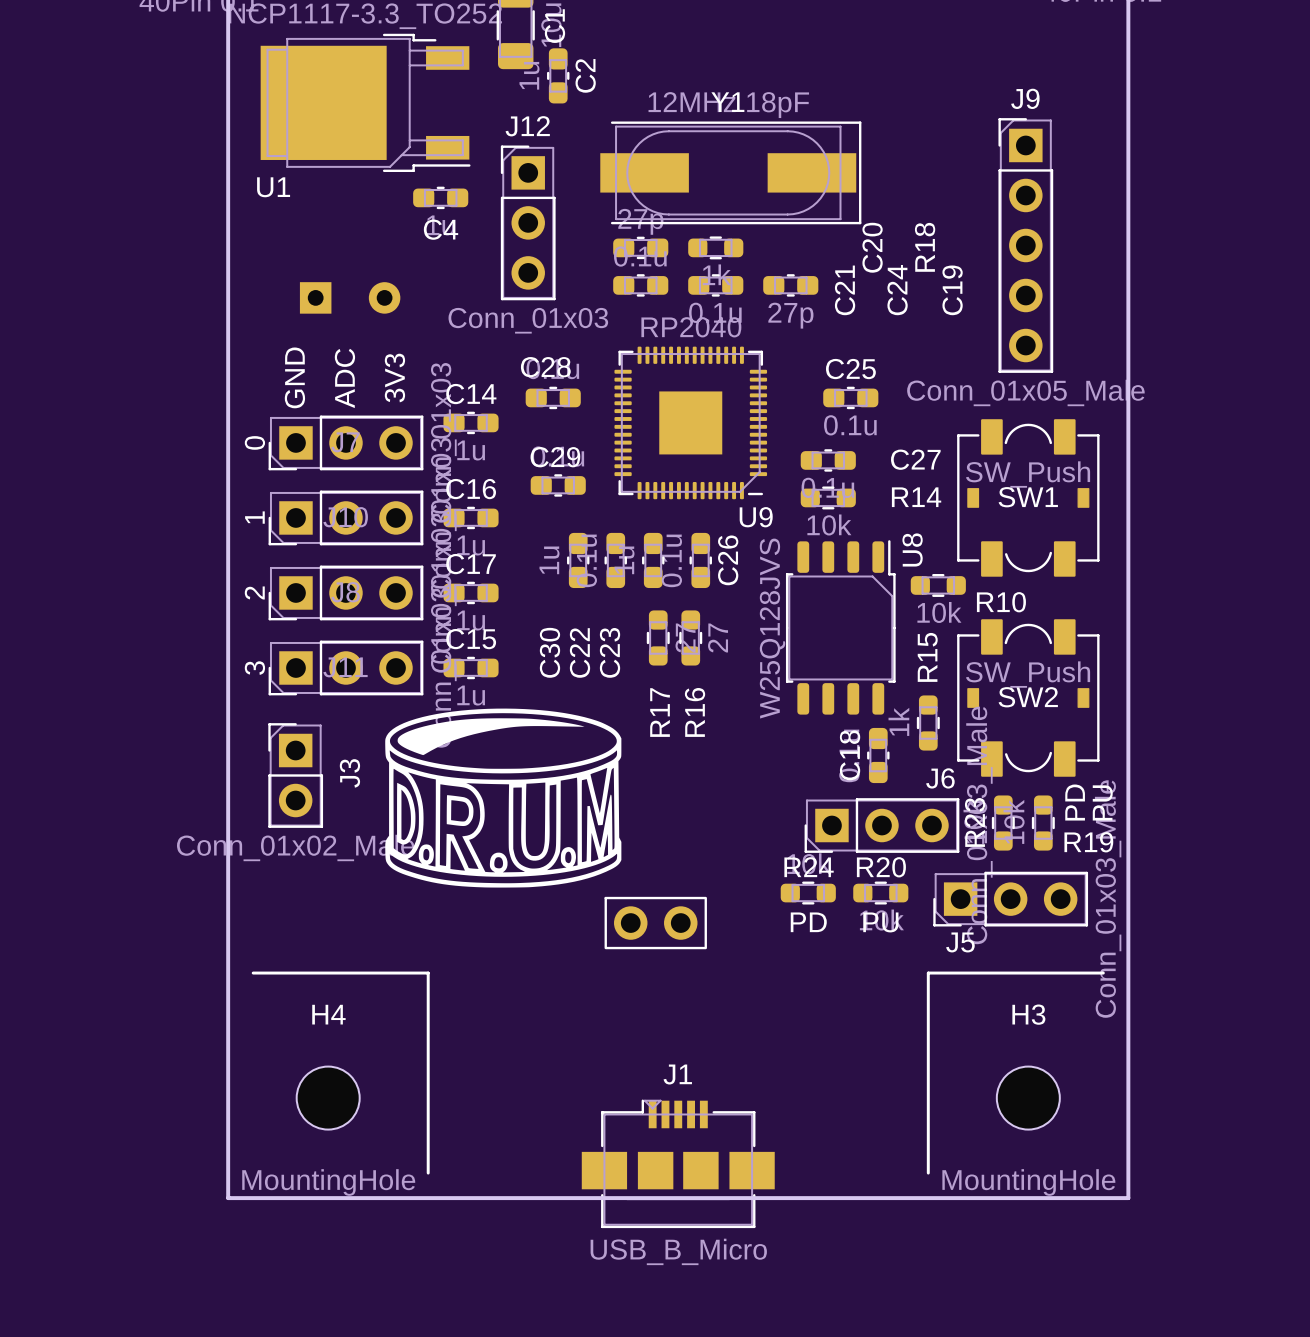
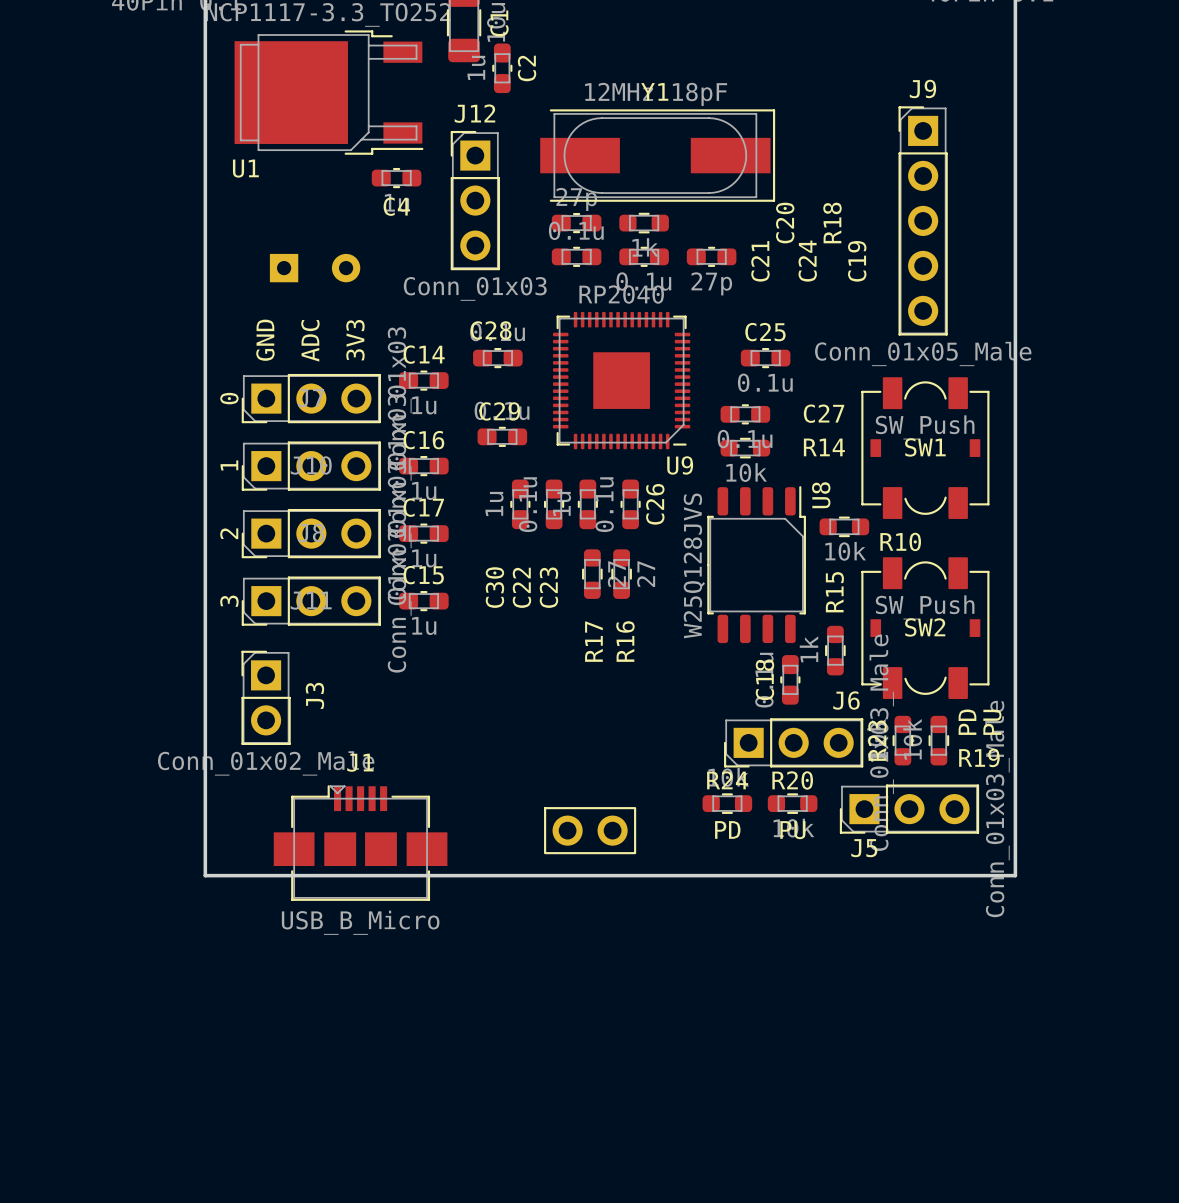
drawing: [385, 708, 622, 888] -> none
board edge: (228, 973) (228, 1198) (1128, 1198) (1128, 973) -> (205, 875) (1015, 875)
line: (253, 973) (428, 973) (428, 1173) -> none
line: (1103, 973) (928, 973) (928, 1173) -> none
H4: MountingHole (328, 1098) -> none
H3: MountingHole (1028, 1098) -> none
J1 position: (678, 1163) -> (360, 843)

